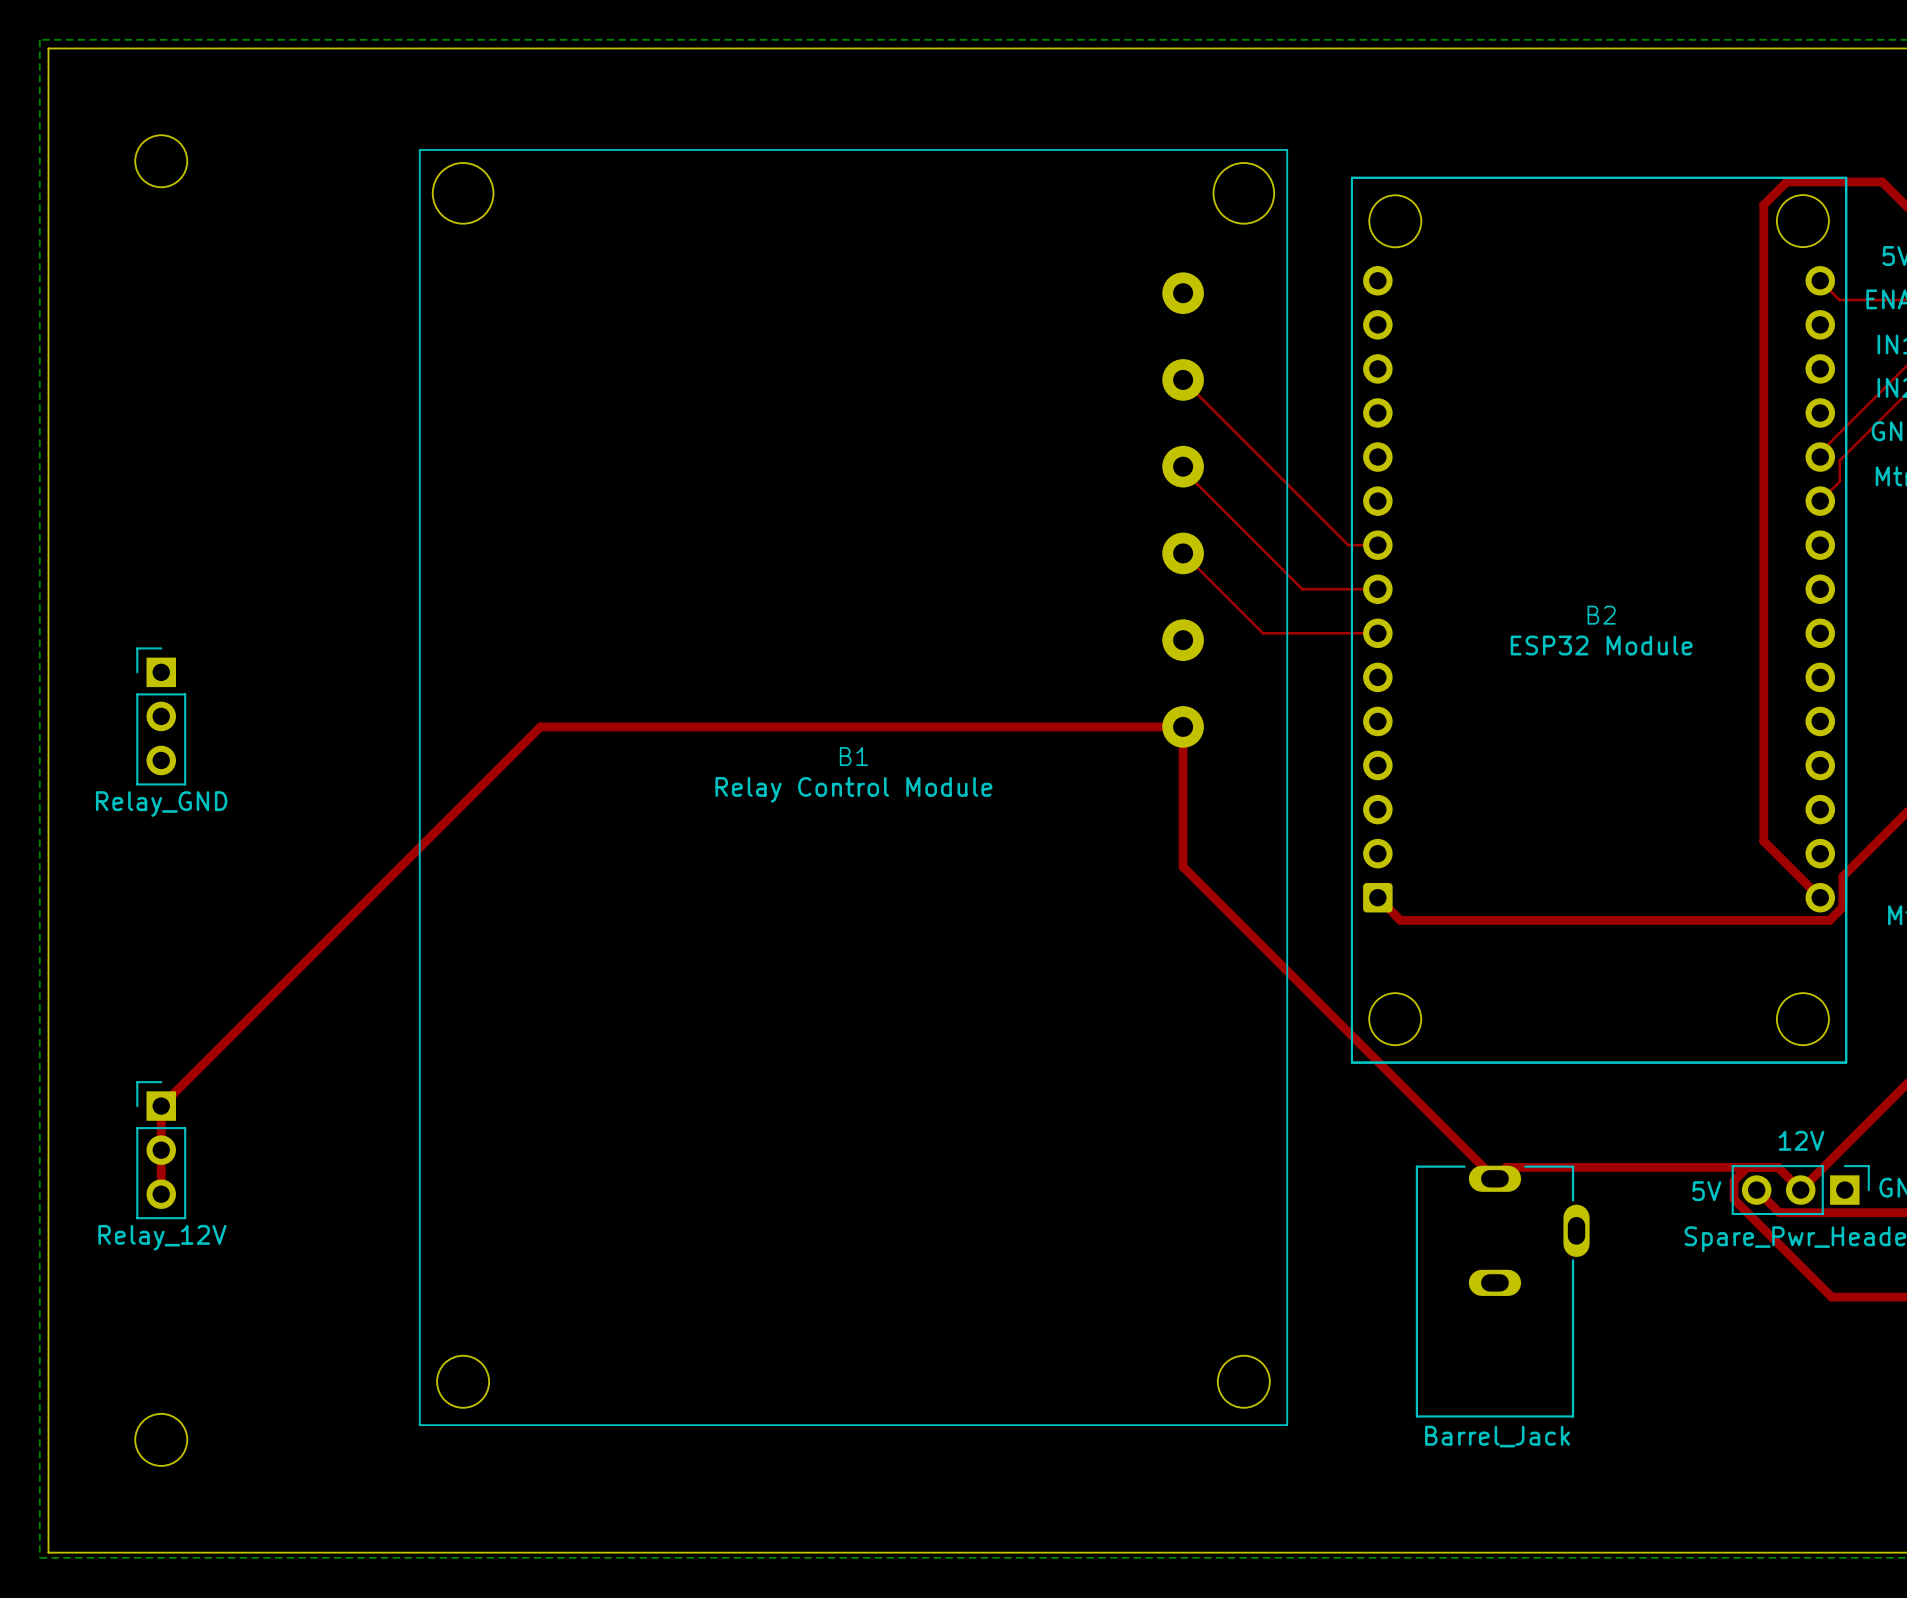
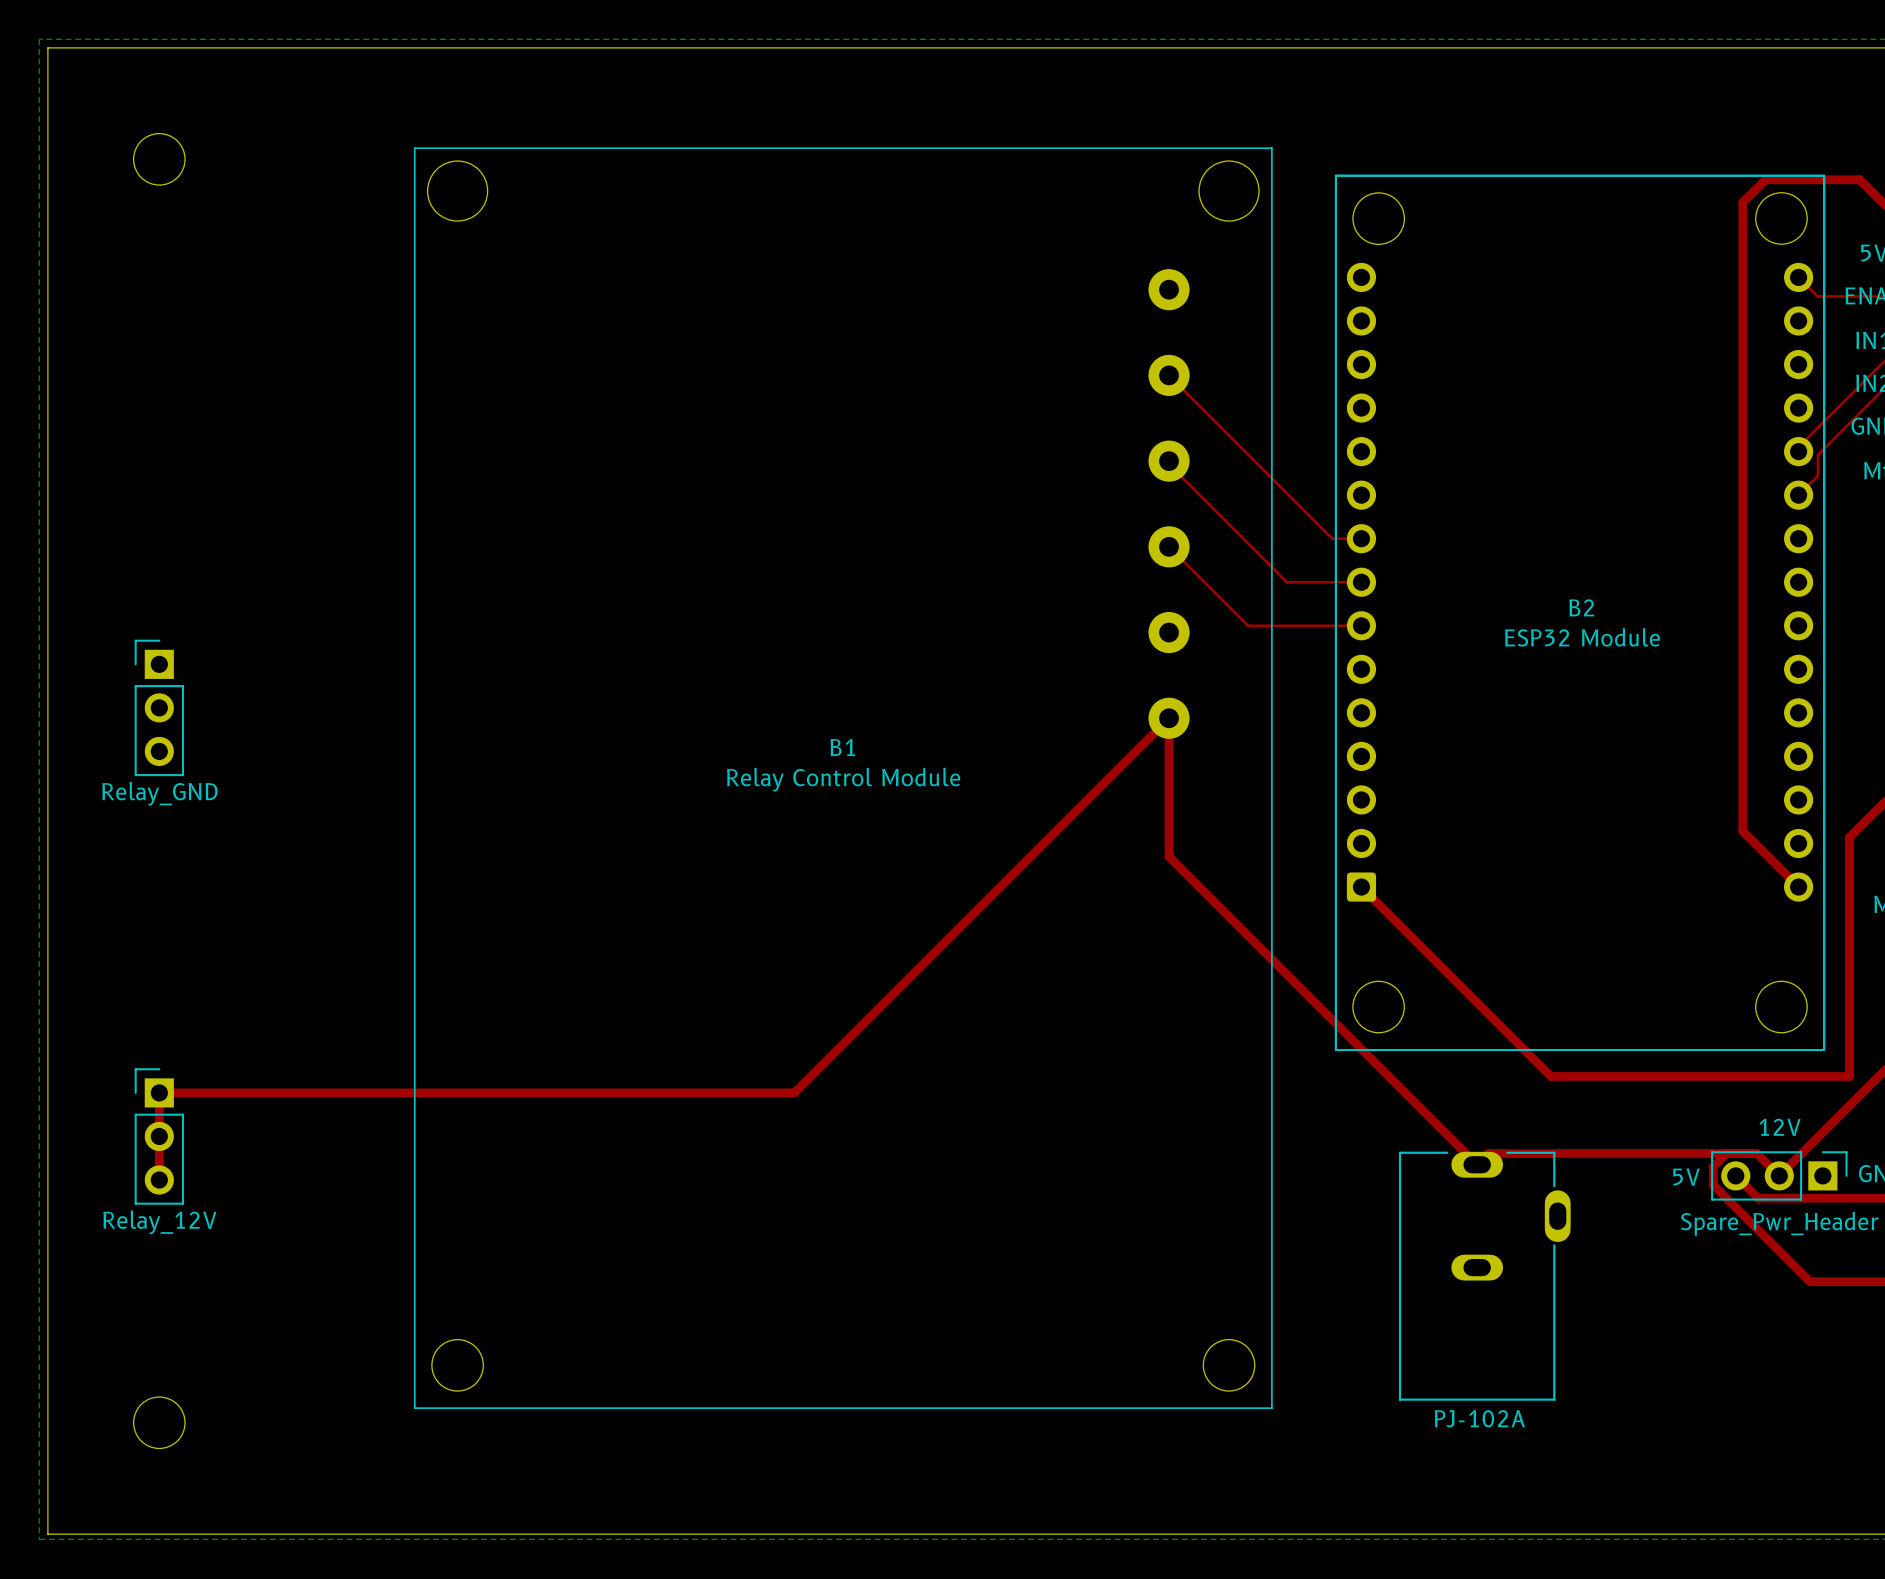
top track: (1183, 726) (540, 726) (161, 1106) -> (1169, 718) (794, 1092) (159, 1092)
top track: (1871, 847) (1842, 876) (1842, 907) (1829, 920) (1400, 920) -> (1849, 837) (1849, 1076) (1550, 1076) (1383, 909)
part value: Barrel_Jack (1497, 1436) -> PJ-102A (1479, 1418)

